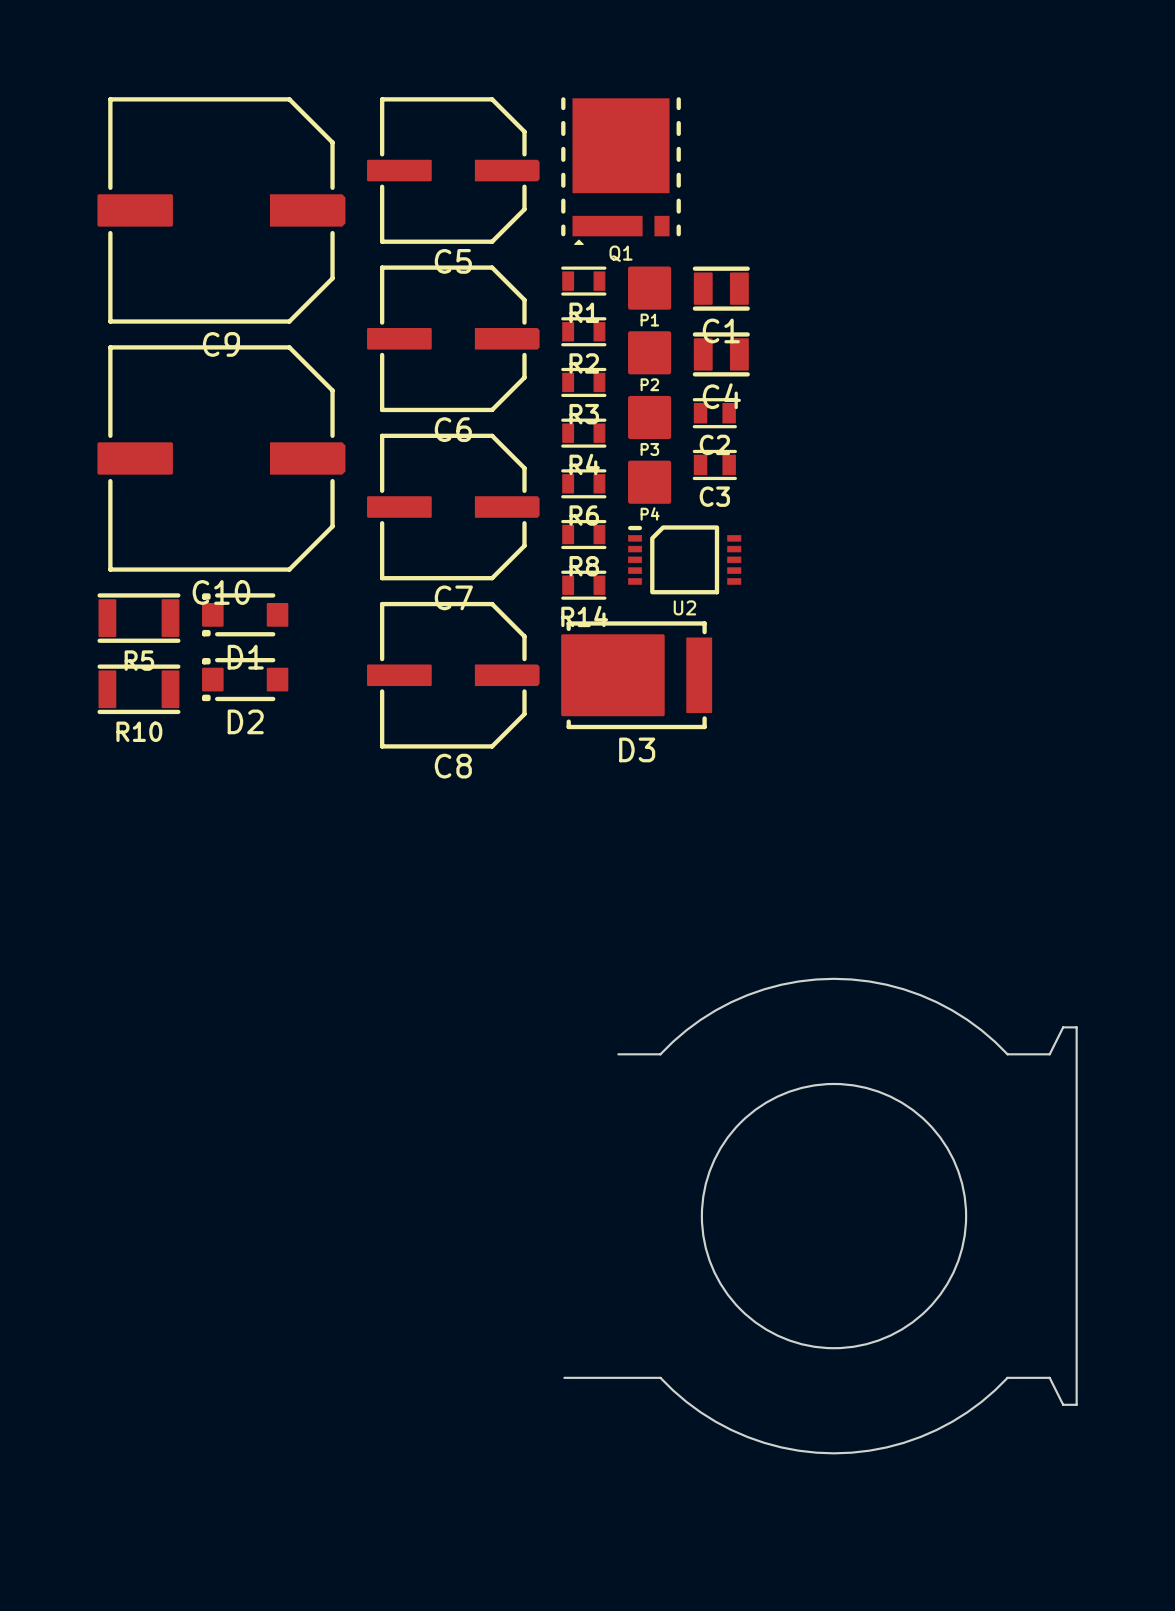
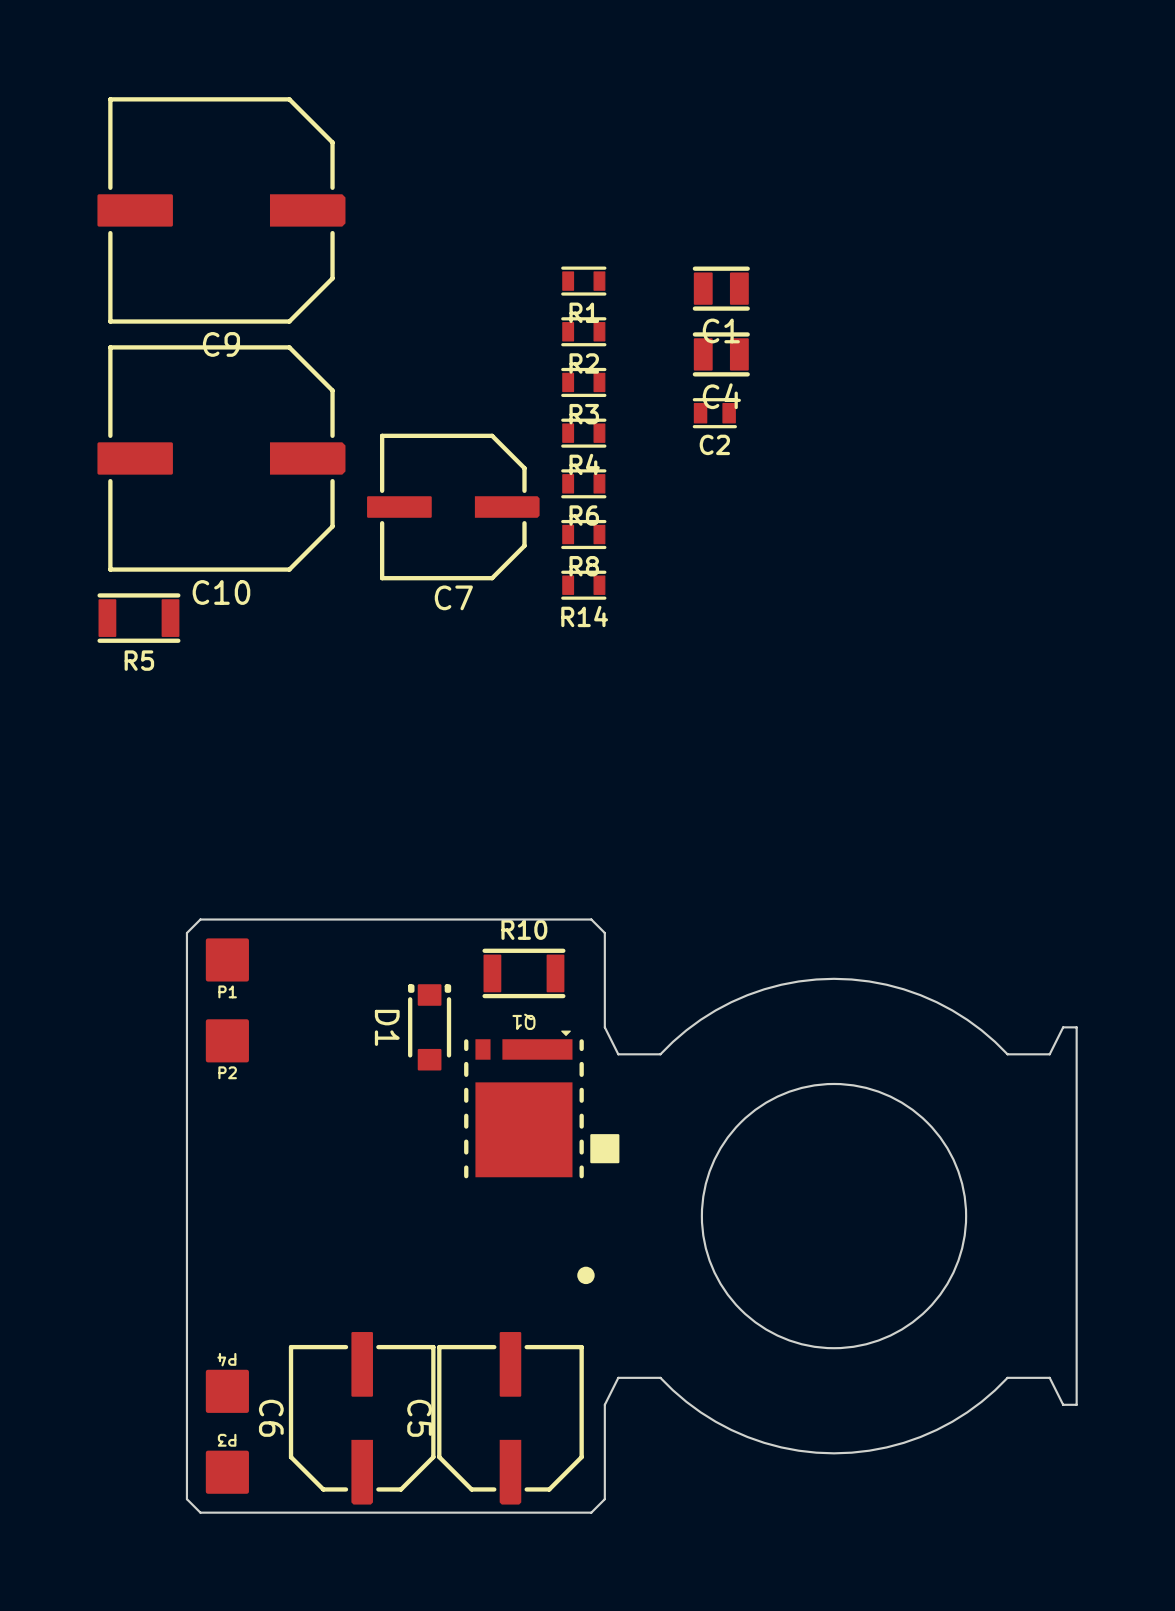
C5 rotation: 0° (453, 170) -> 90° clockwise (510, 1418)
C5 position: (453, 170) -> (510, 1418)
Q1 rotation: 0° (621, 171) -> 180° (523, 1104)
Q1 position: (621, 171) -> (523, 1104)
P1 position: (649, 288) -> (227, 959)
C6 rotation: 0° (453, 338) -> 90° clockwise (362, 1418)
C6 position: (453, 338) -> (362, 1418)
P2 position: (649, 352) -> (227, 1040)
P3 position: (649, 417) -> (227, 1472)
P3 name rotation: 0° (649, 449) -> 180° (227, 1440)
P3 name position: P3 (649, 449) -> P3 (227, 1440)
C3: (714, 464) -> none
P4 position: (649, 482) -> (227, 1391)
P4 name rotation: 0° (650, 513) -> 180° (226, 1359)
P4 name position: P4 (650, 513) -> P4 (226, 1359)
U2: (684, 559) -> none
D1 rotation: 0° (245, 614) -> 90° clockwise (429, 1027)
D1 position: (245, 614) -> (429, 1027)
C8: (453, 675) -> none
D3: (636, 675) -> none
D2: (245, 679) -> none
R10 position: (138, 689) -> (523, 973)
R10 name position: R10 (139, 731) -> R10 (524, 929)
drawing: none -> [590, 1134, 620, 1164]
drawing: none -> [577, 1266, 595, 1285]
board edge: (564, 1377) (618, 1377) -> (618, 1054) (604, 1027) (604, 932) (591, 919) (200, 919) (186, 932) (186, 1499) (200, 1512) (591, 1512) (604, 1499) (604, 1404) (618, 1377)

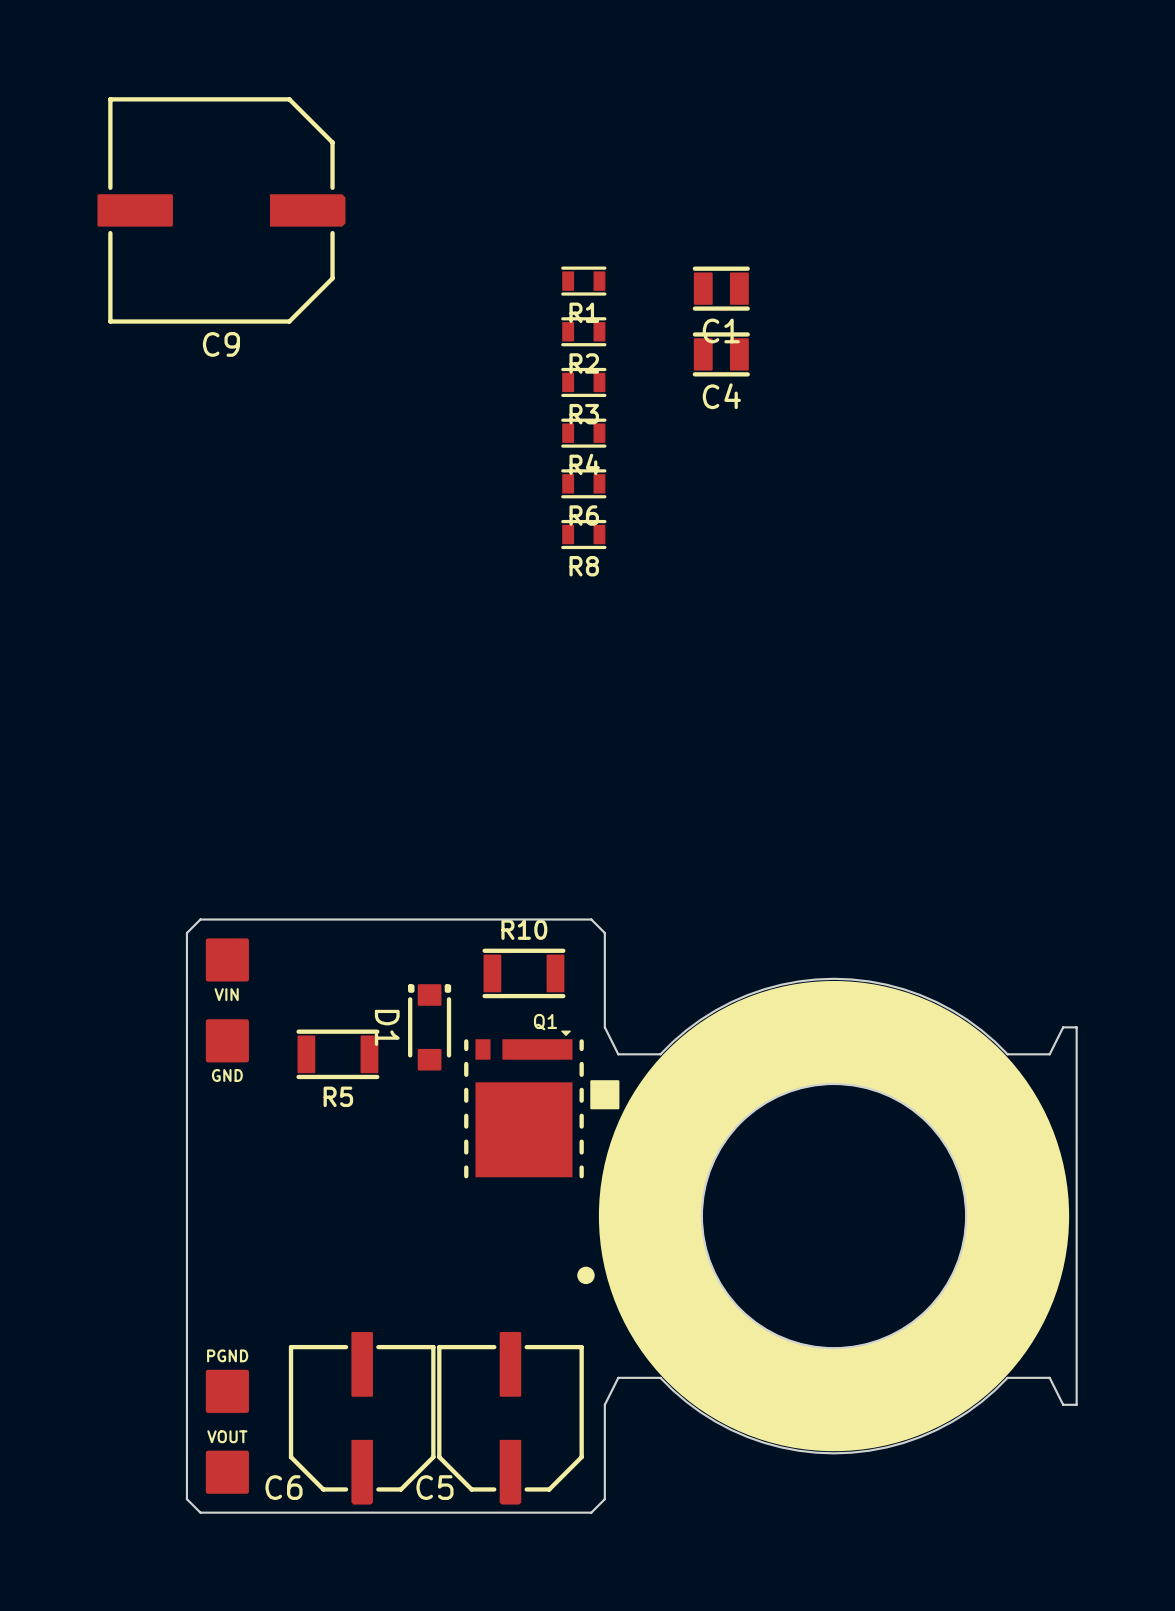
C2: (714, 413) -> none
C10: (221, 458) -> none
C7: (453, 507) -> none
R14: (583, 585) -> none
R5 position: (138, 618) -> (337, 1054)
drawing: none -> [598, 980, 1070, 1452]
P1 name: P1 (227, 991) -> none
P1 value: none -> VIN (226, 994)
Q1 name rotation: 0° (523, 1021) -> 180° (545, 1022)
P2 name: P2 (227, 1072) -> none
P2 value: none -> GND (227, 1075)
drawing position: (604, 1148) -> (604, 1094)
P4 value: none -> PGND (227, 1355)
P4 name: P4 (226, 1359) -> none
C6 name rotation: 0° (271, 1418) -> 90° counterclockwise (284, 1487)
C6 name position: C6 (271, 1418) -> C6 (284, 1487)
C5 name rotation: 0° (419, 1418) -> 90° counterclockwise (434, 1487)
C5 name position: C5 (419, 1418) -> C5 (434, 1487)
P3 value: none -> VOUT (227, 1436)
P3 name: P3 (227, 1440) -> none

